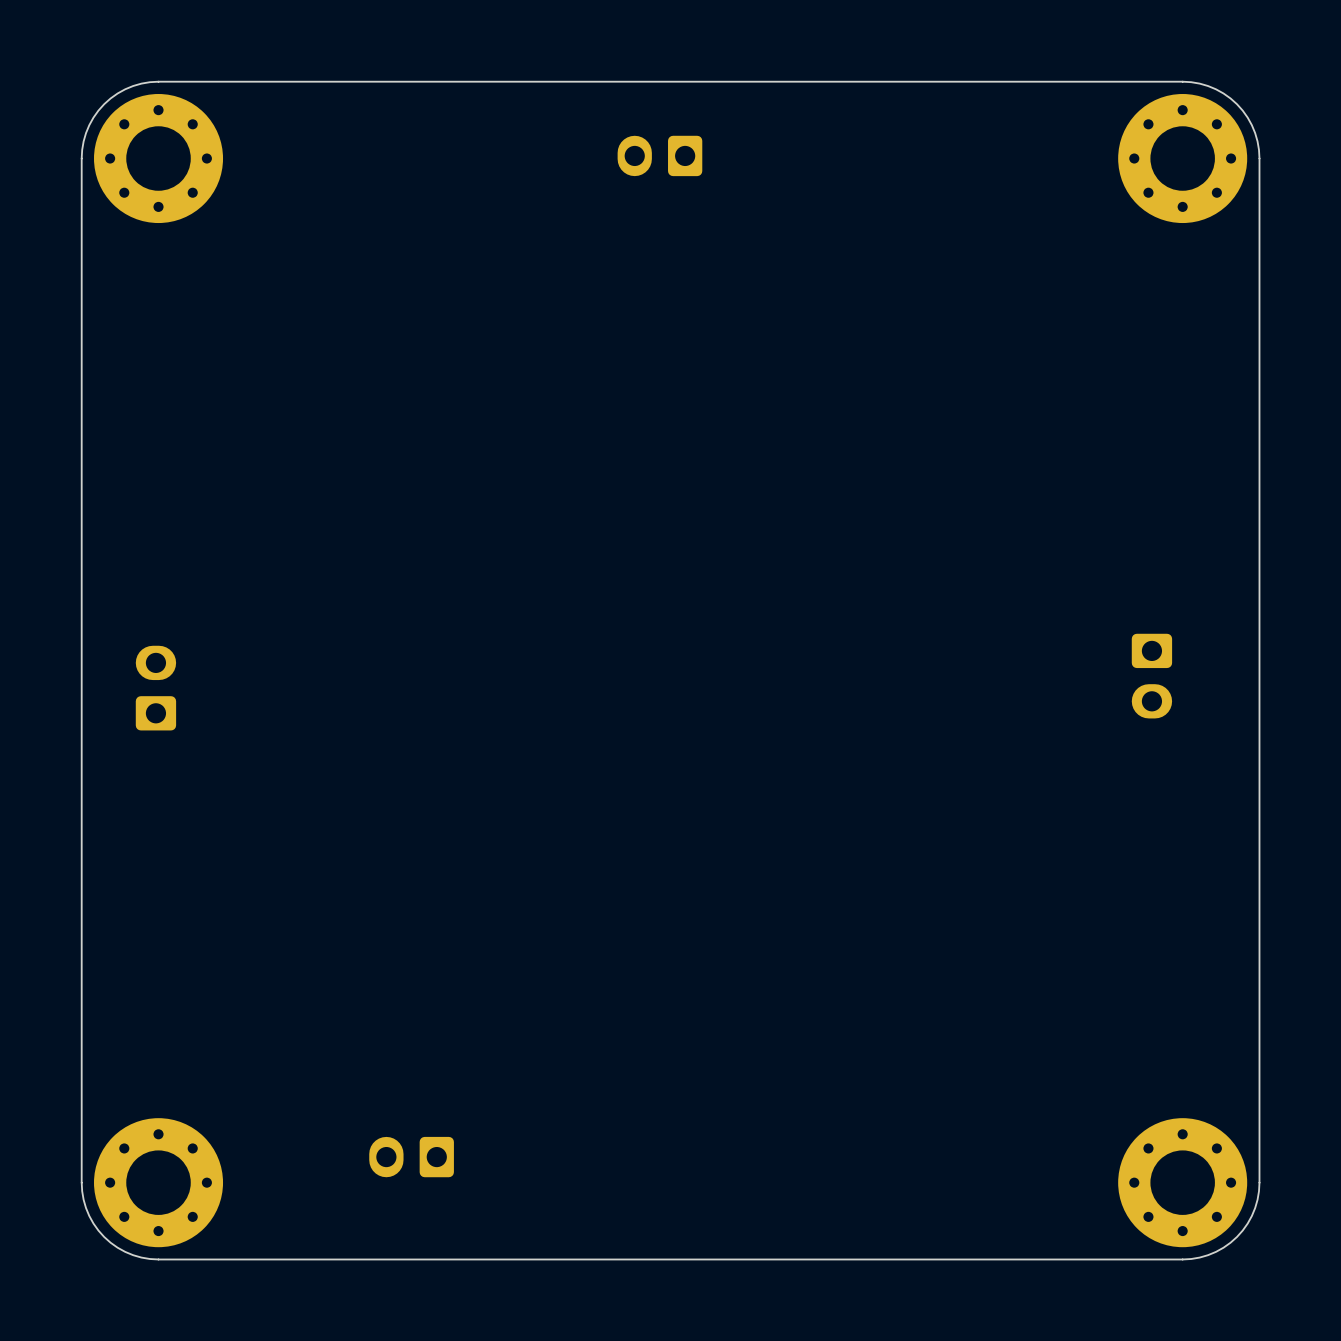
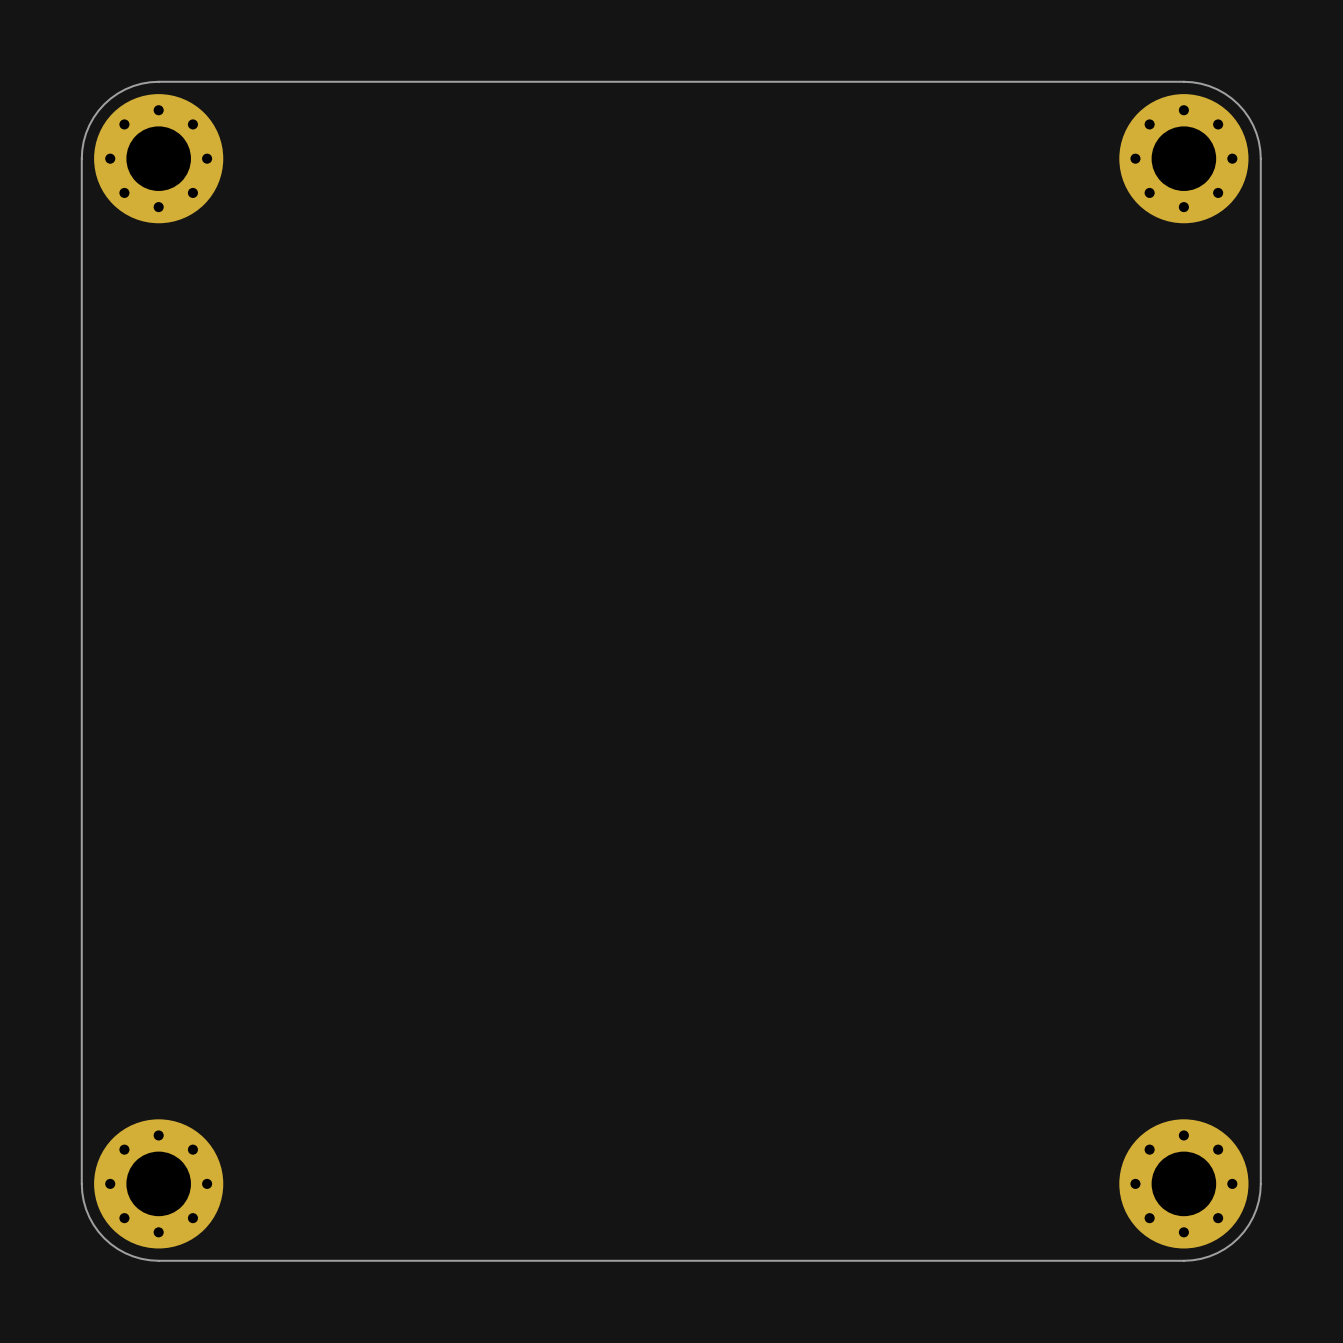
part: (659, 155) -> none
part: (1151, 676) -> none
part: (155, 688) -> none
part: (411, 1157) -> none

